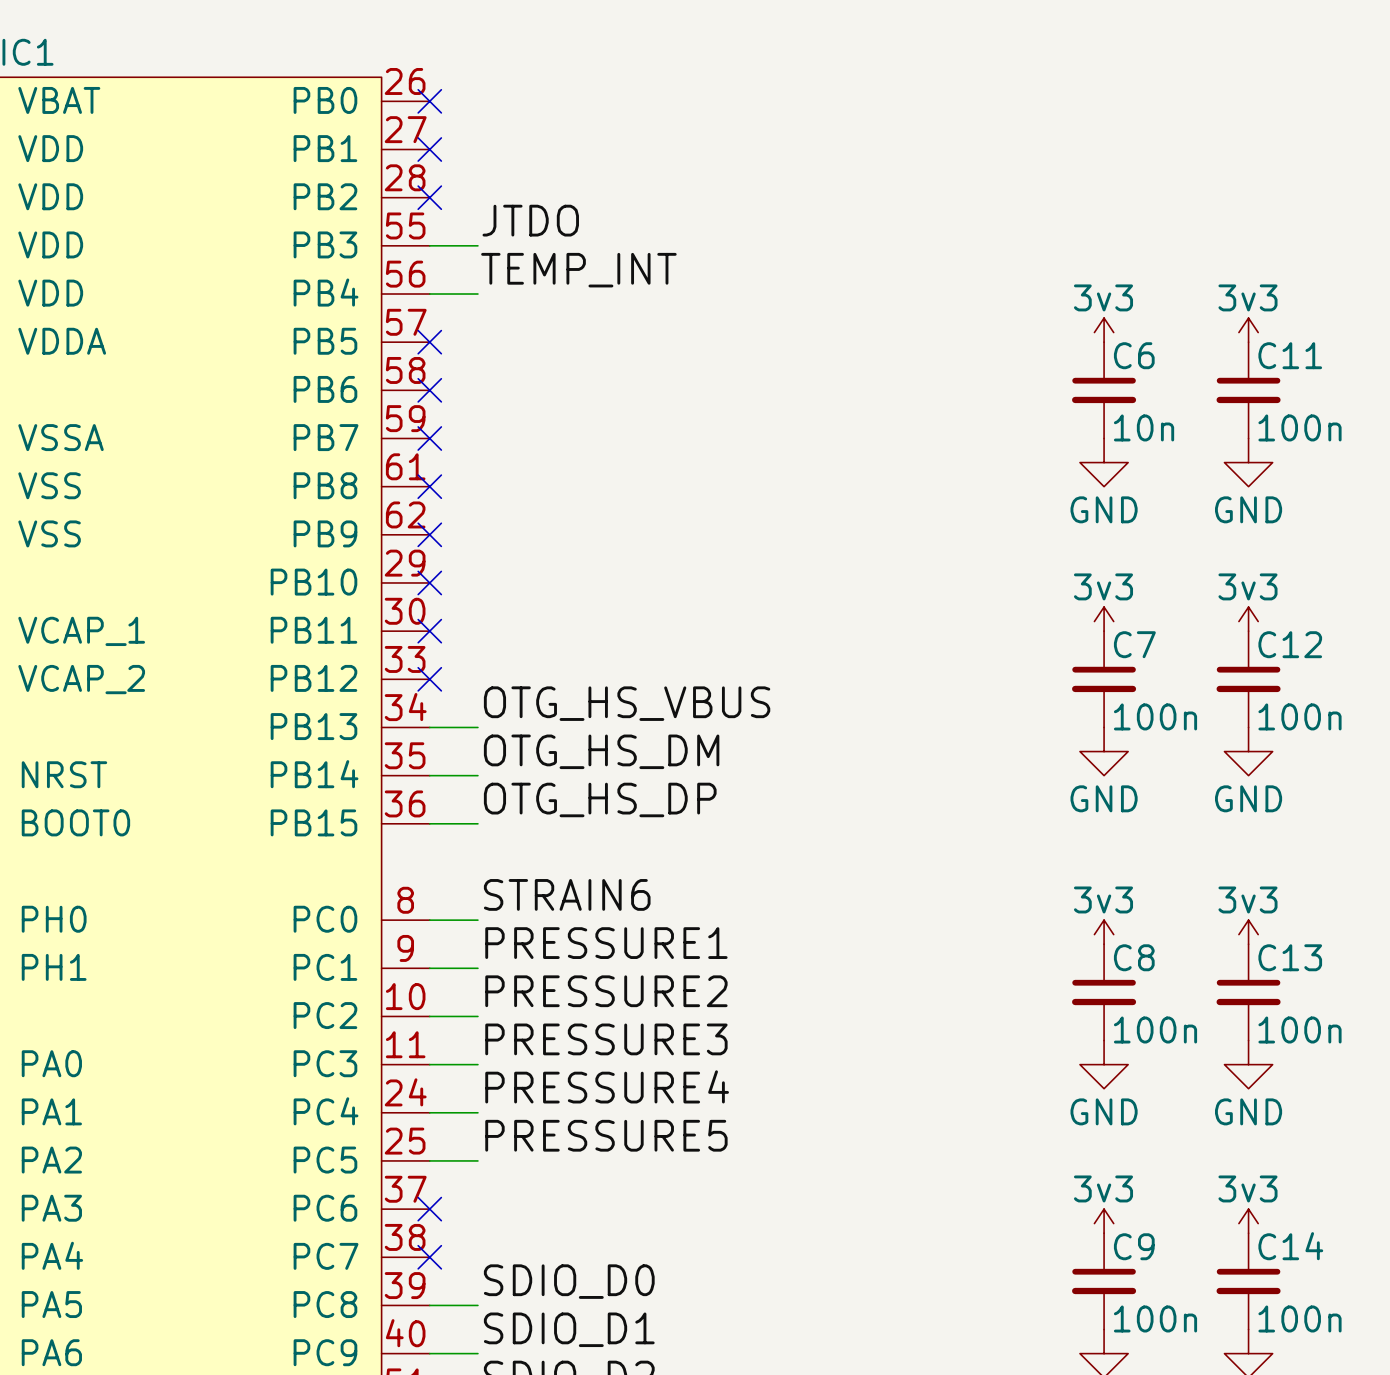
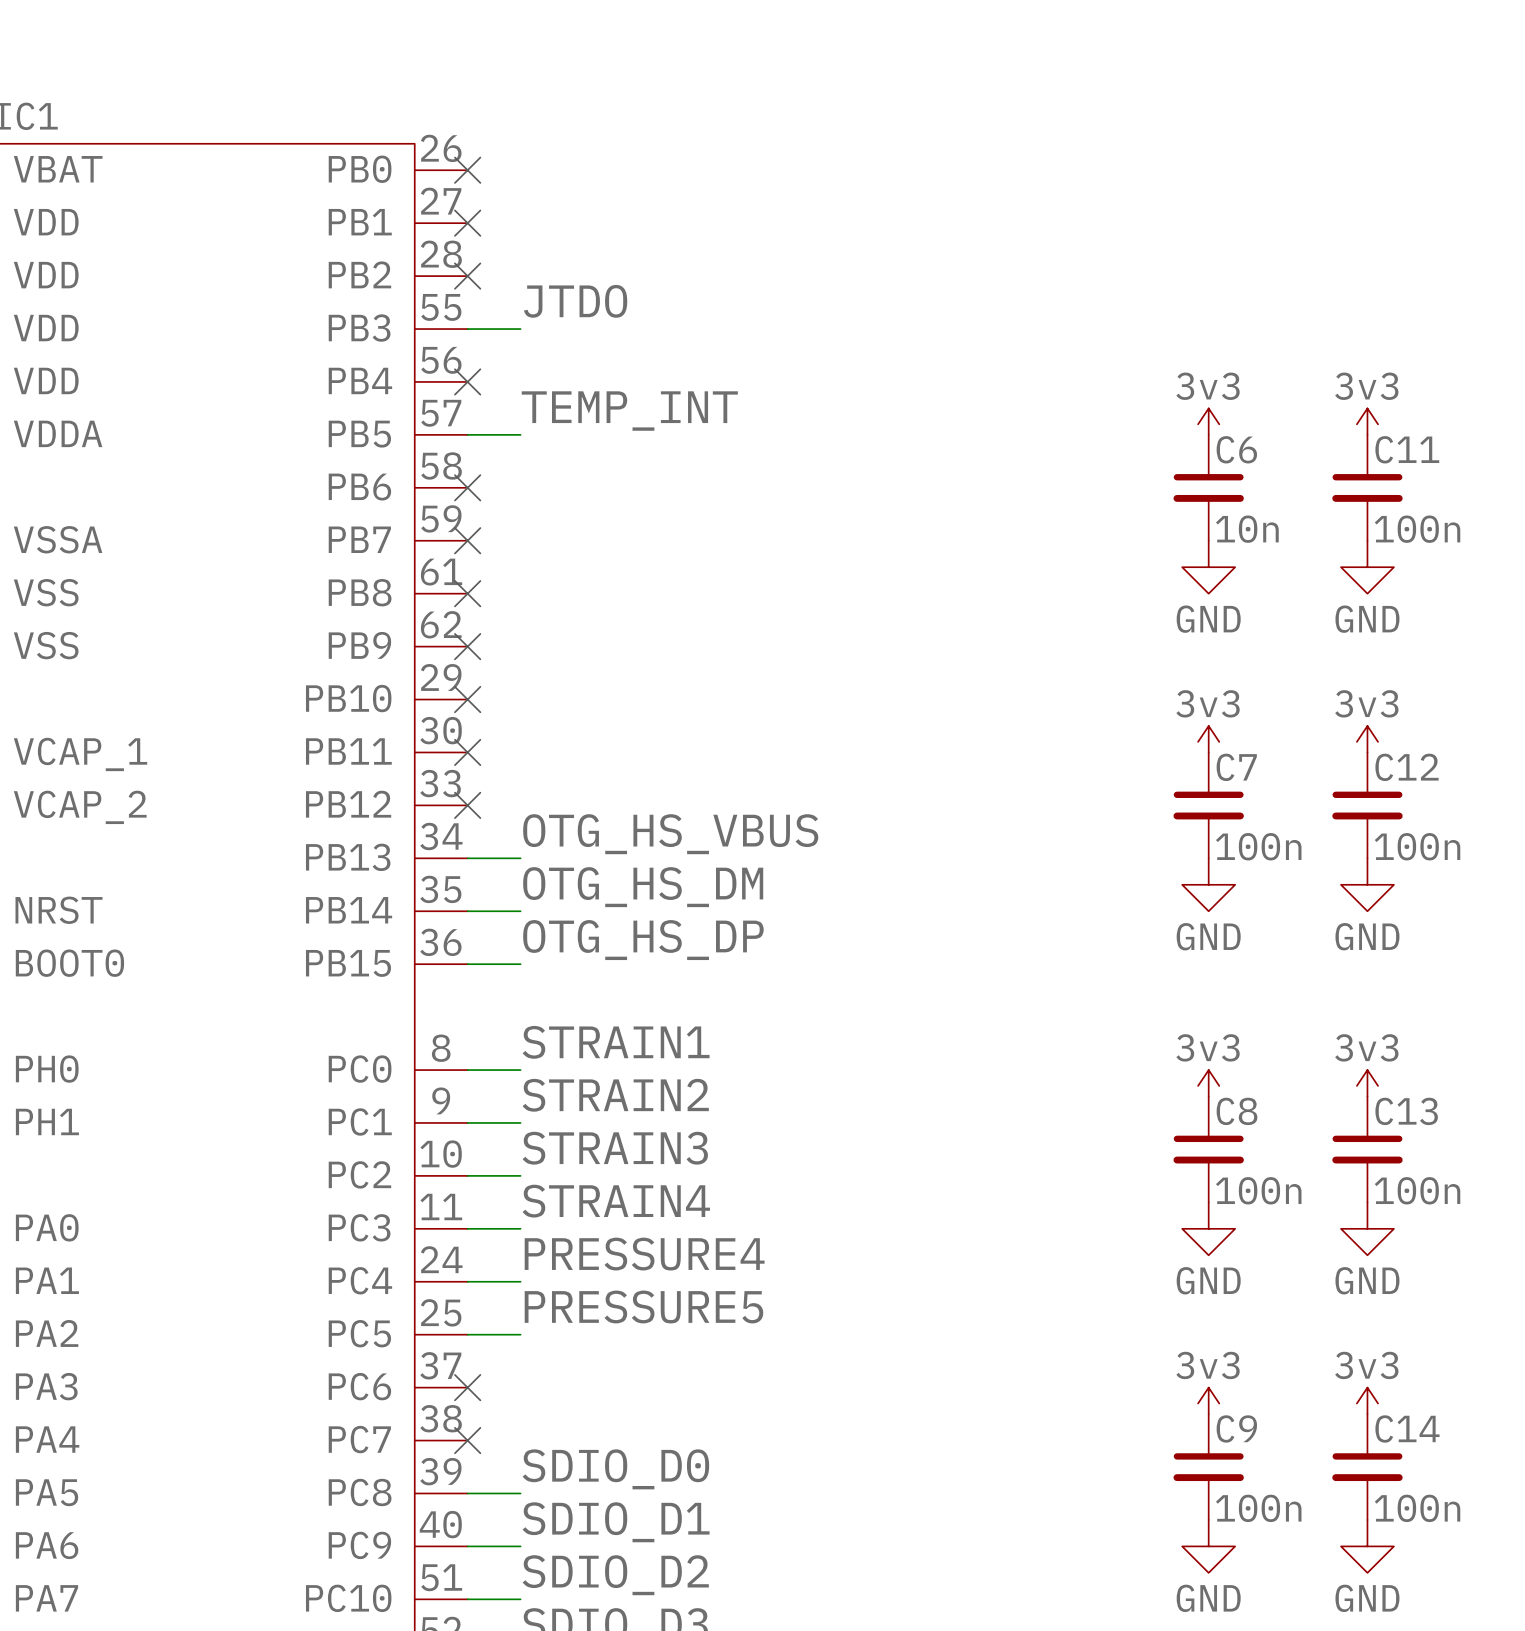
label position: TEMP_INT (578, 270) -> TEMP_INT (629, 411)
wire: (429, 294) (477, 294) -> (467, 434) (520, 434)
no-connect mark position: (429, 342) -> (467, 381)
label: STRAIN6 (567, 894) -> STRAIN1 (616, 1042)
label: PRESSURE1 (606, 943) -> STRAIN2 (615, 1095)
label: PRESSURE2 (606, 991) -> STRAIN3 (615, 1148)
label: PRESSURE3 (606, 1039) -> STRAIN4 (616, 1201)

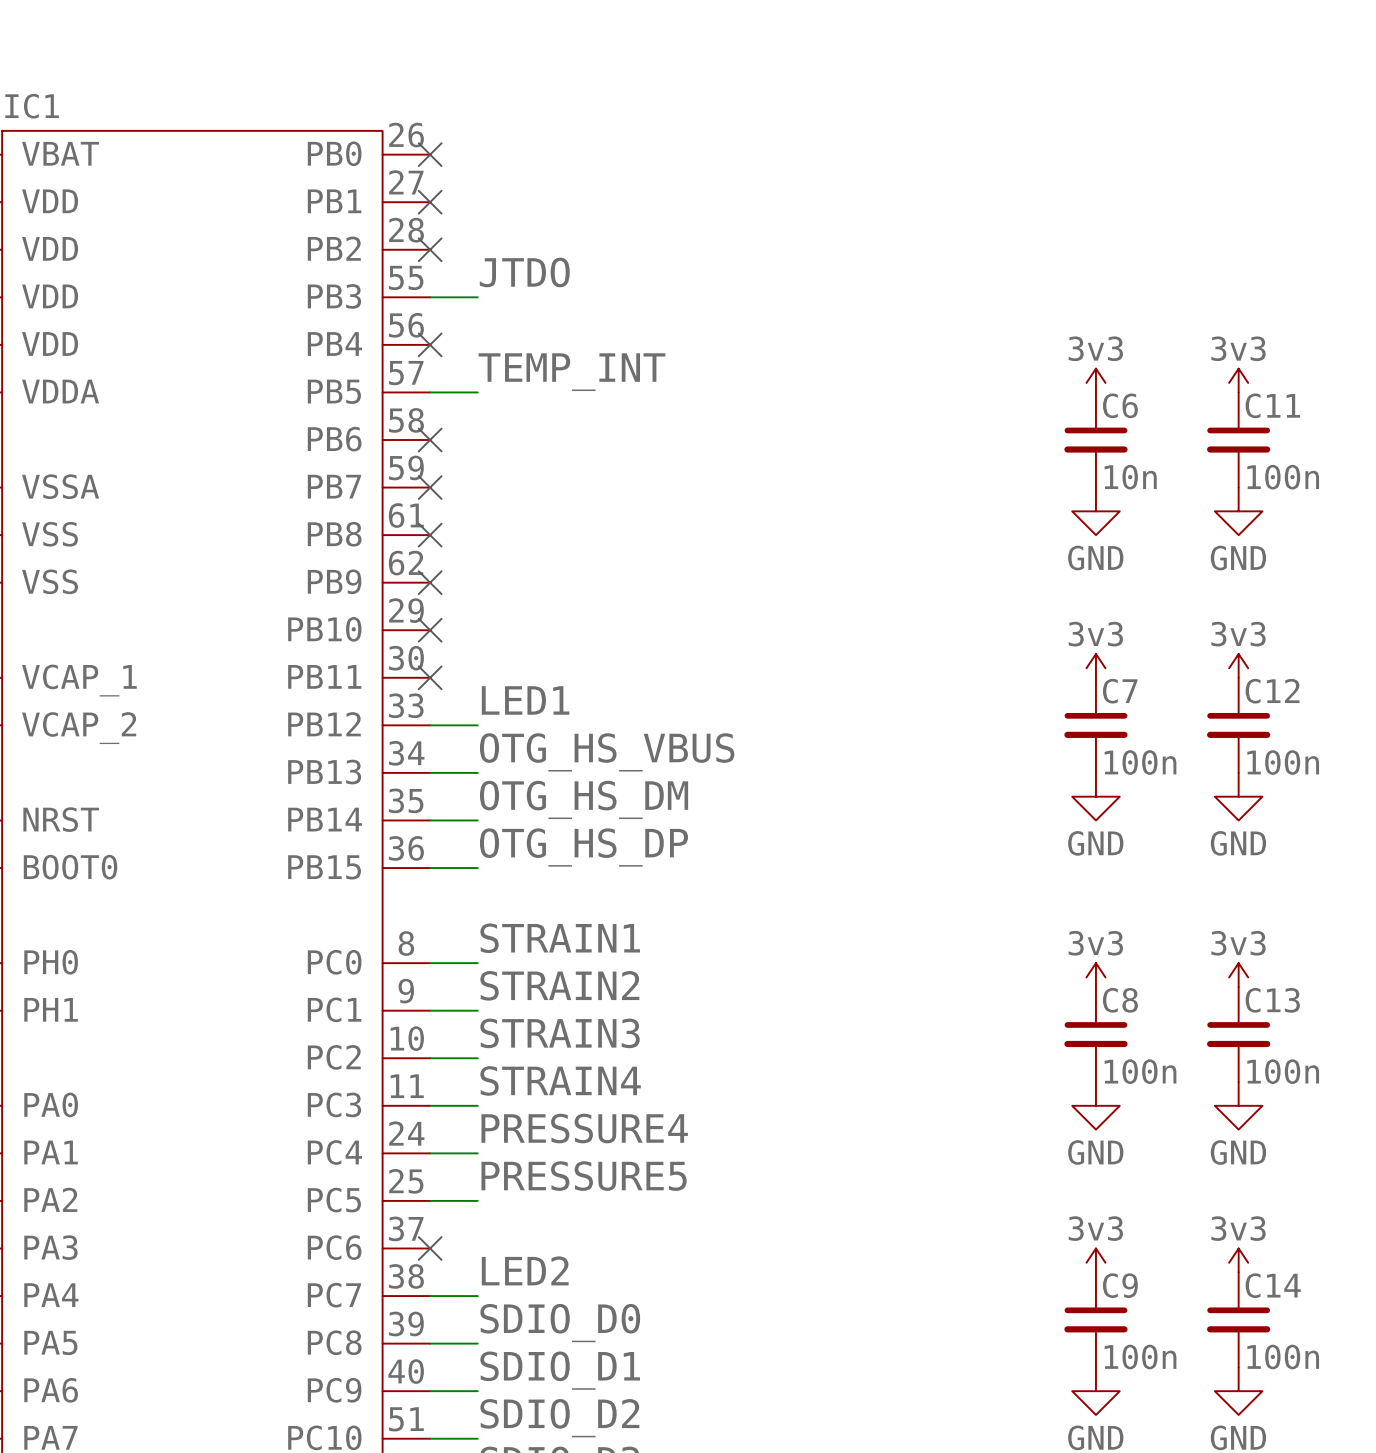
label: none -> LED1 (525, 700)
wire: none -> (430, 725) (477, 725)
no-connect mark: (467, 805) -> none
label: none -> LED2 (525, 1270)
wire: none -> (430, 1296) (477, 1296)
no-connect mark: (467, 1440) -> none

